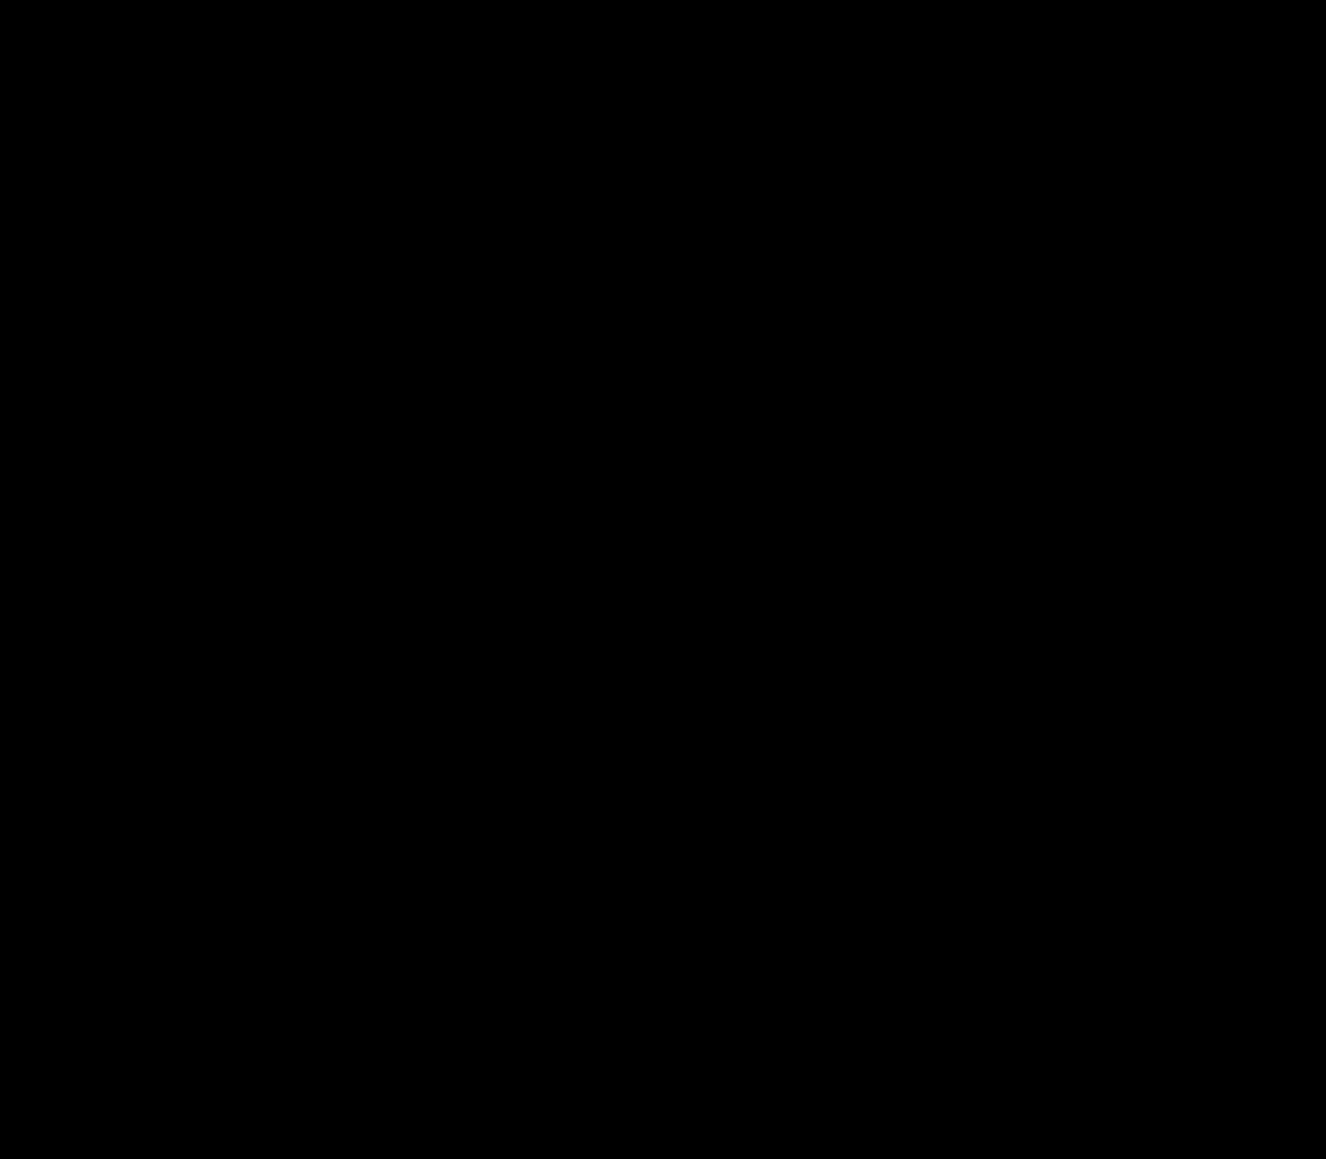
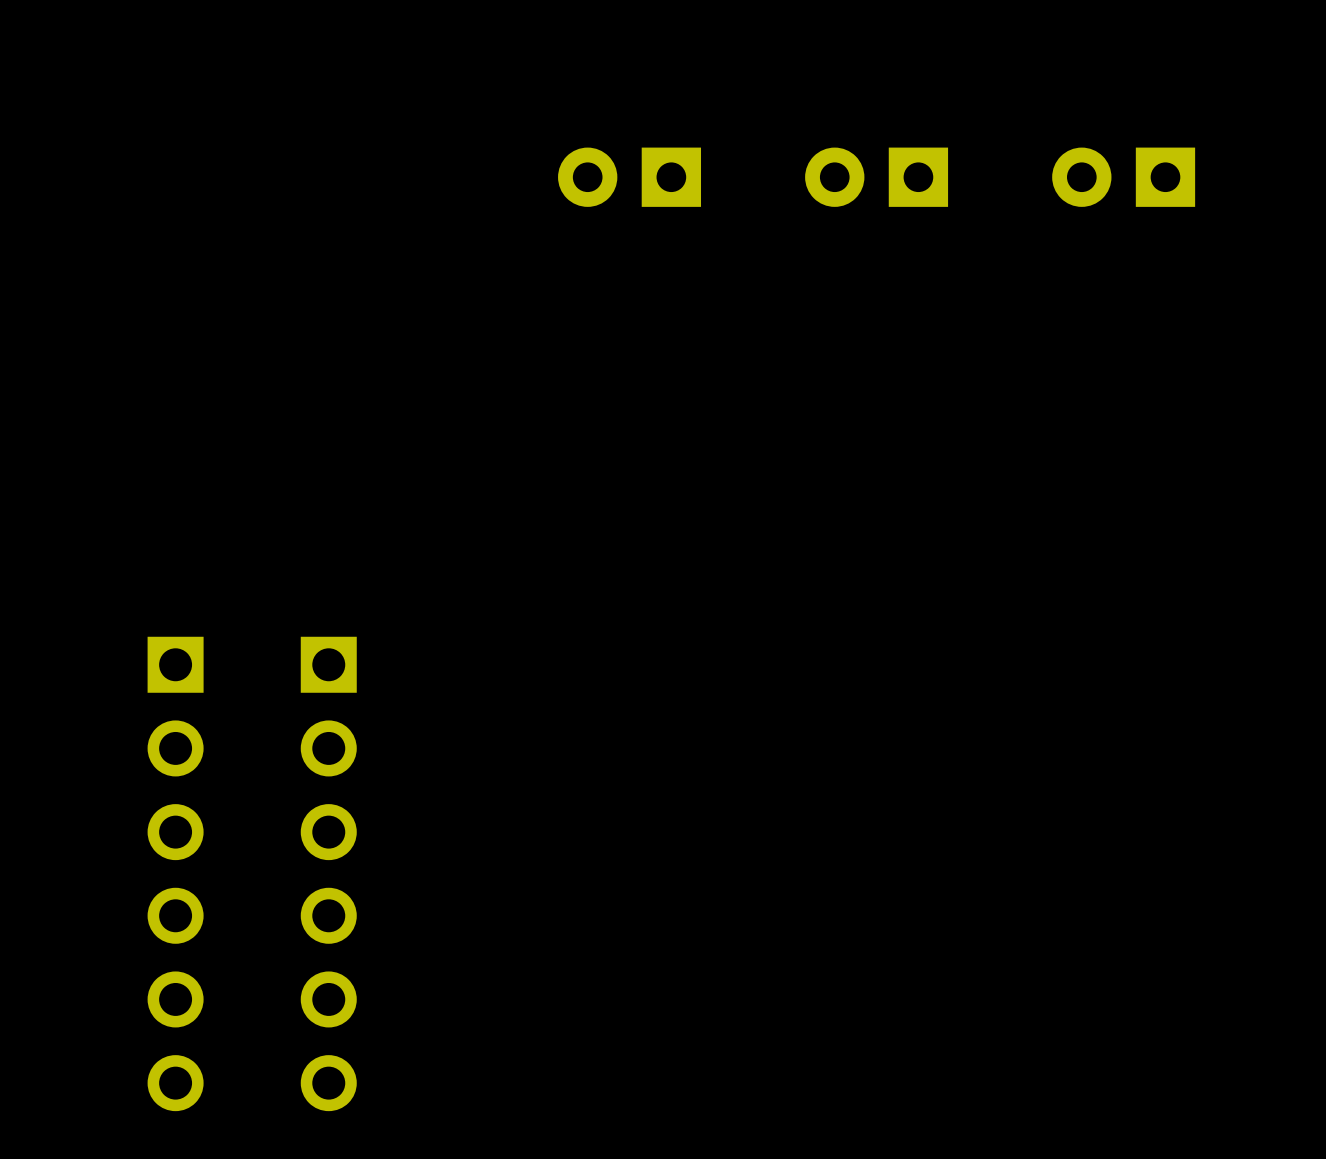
part: none -> (629, 177)
part: none -> (876, 177)
part: none -> (1123, 177)
part: none -> (175, 873)
part: none -> (328, 873)

